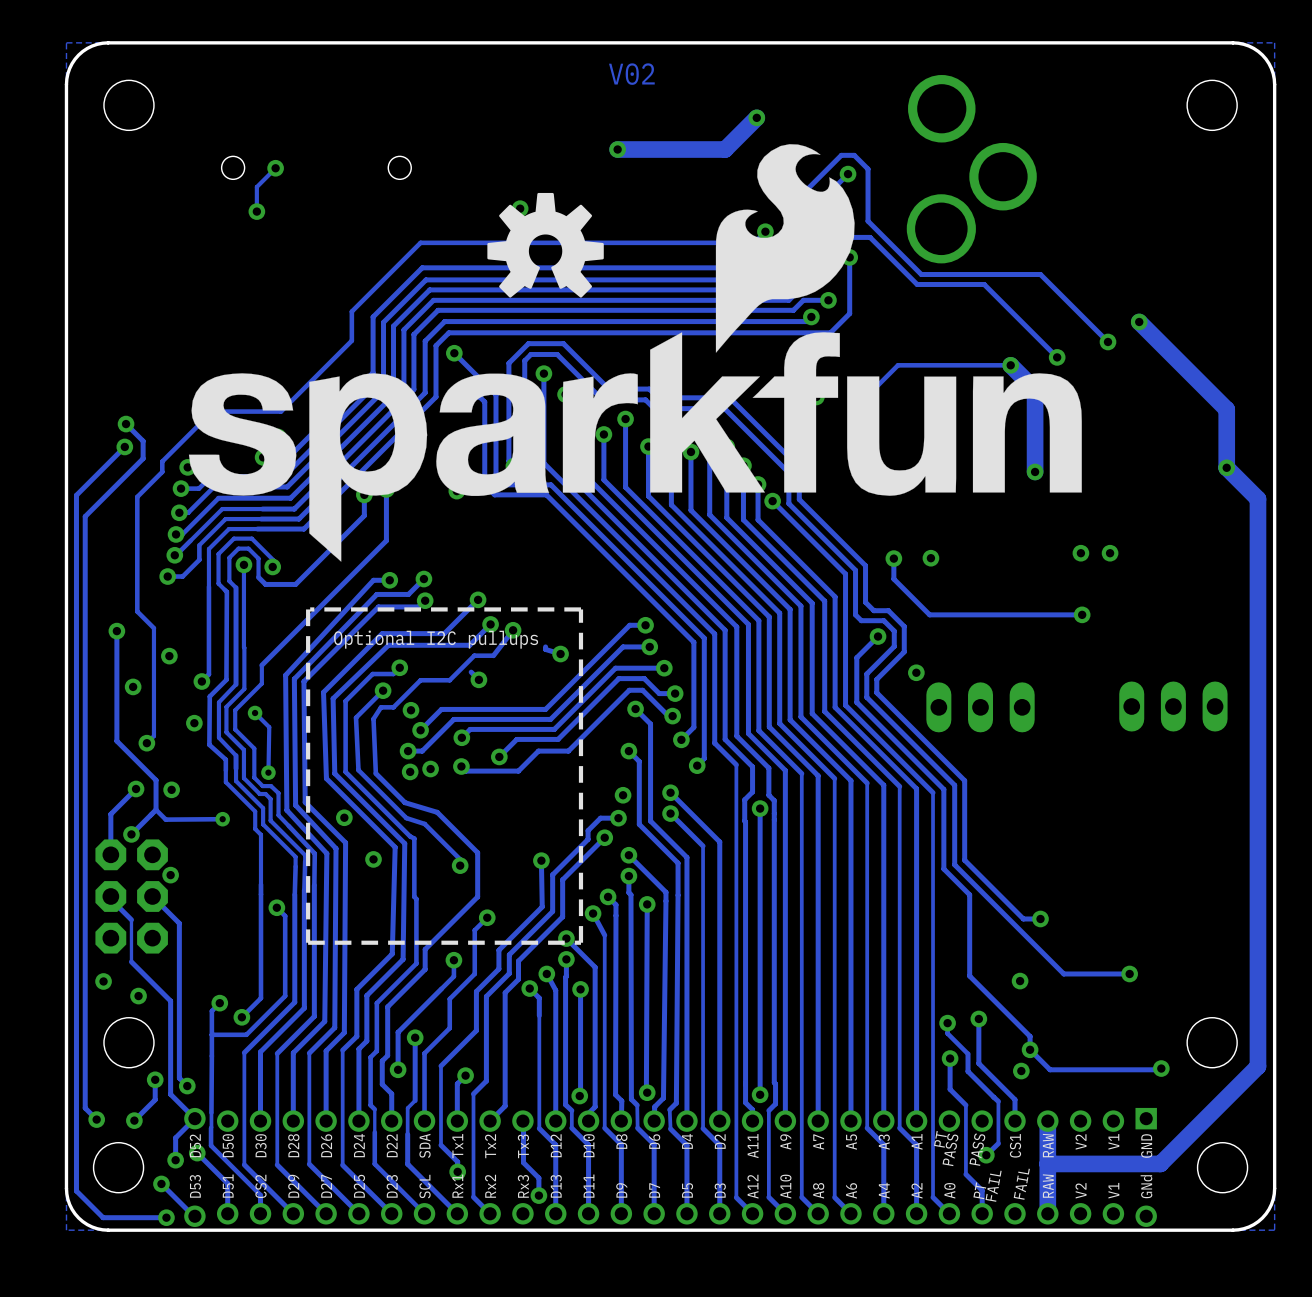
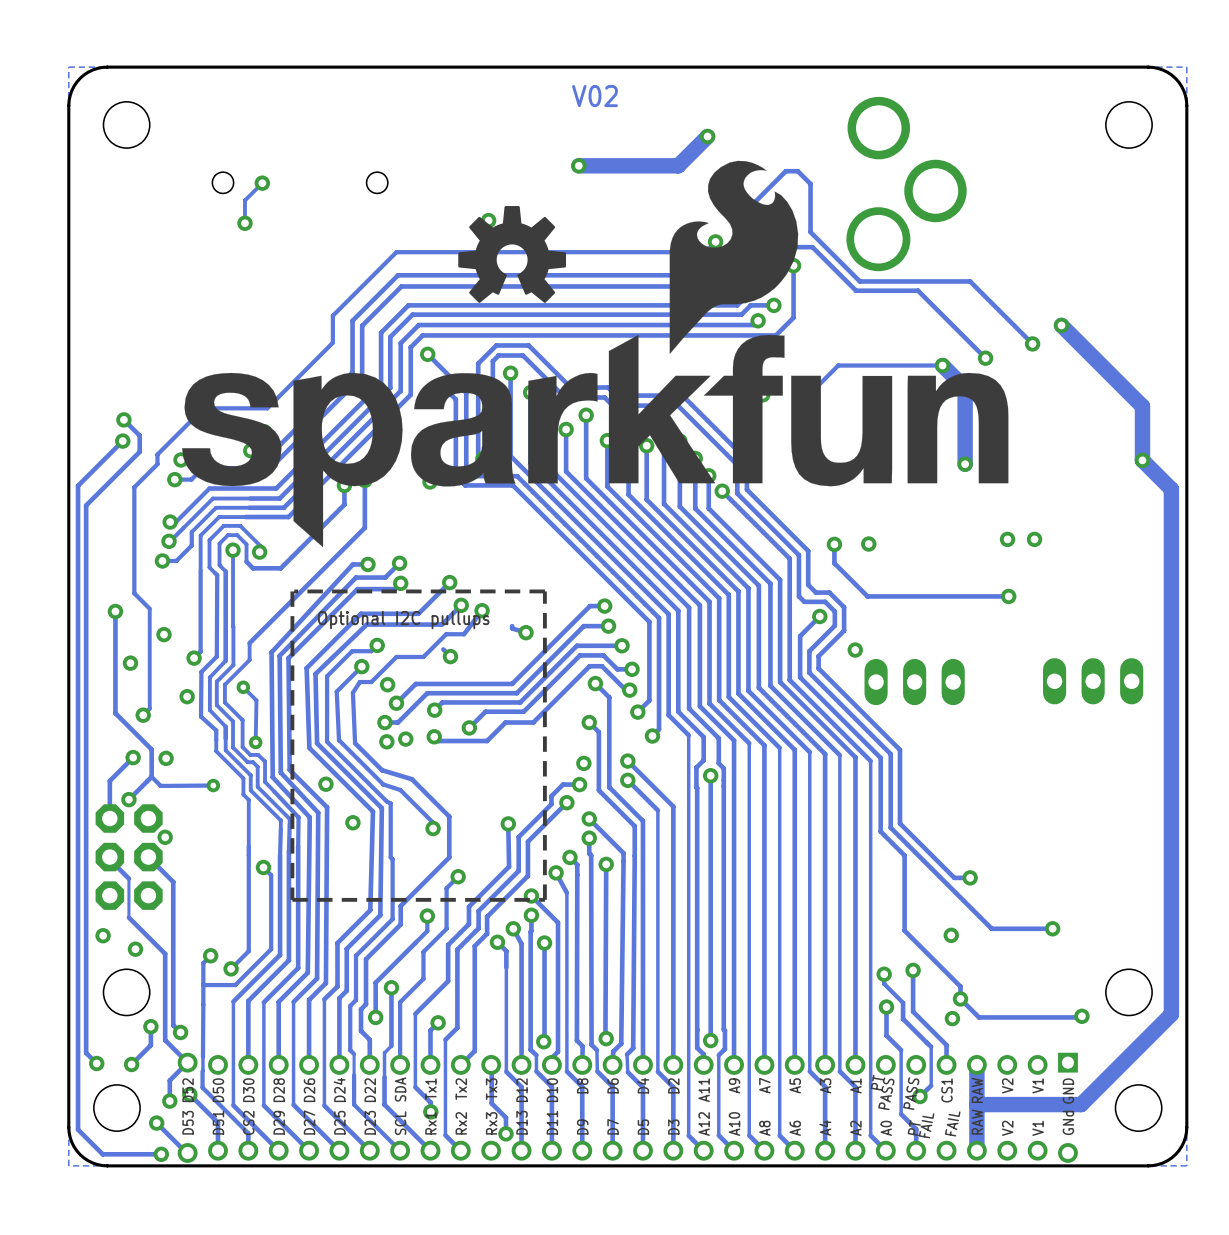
track: (848, 174) (813, 208) (813, 261) (784, 289) (429, 289) (393, 326) (393, 380) (287, 486) (213, 486) (188, 512) (179, 512) -> none
via: (848, 174) -> none
via: (179, 512) -> none

